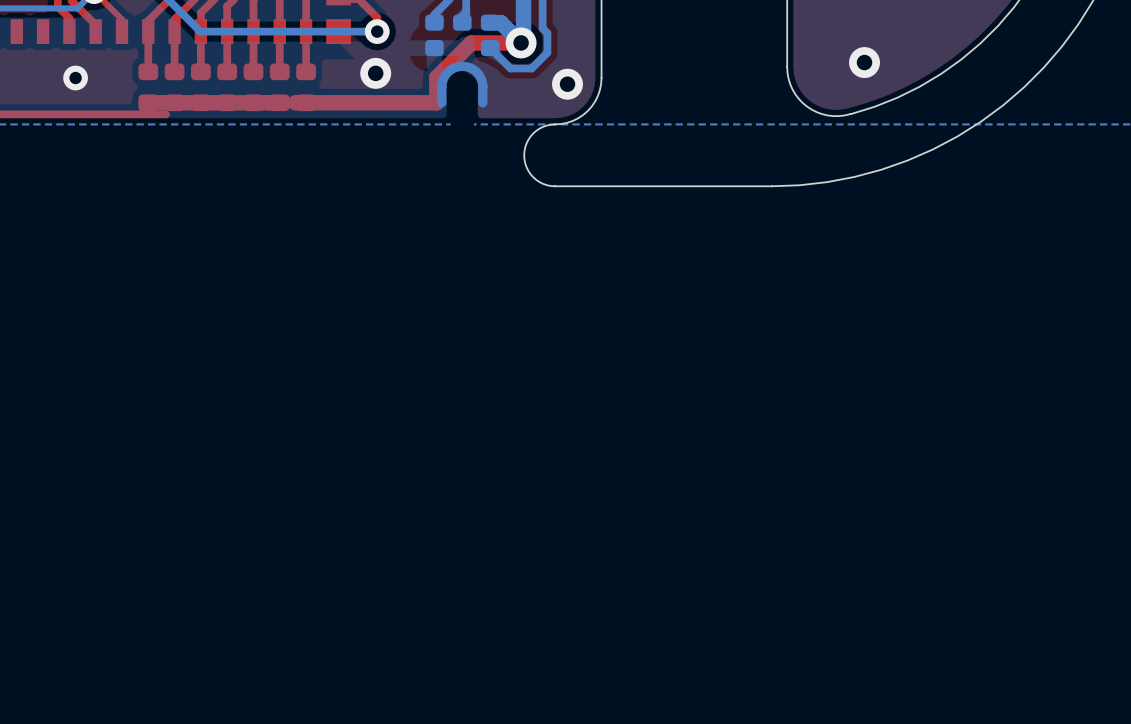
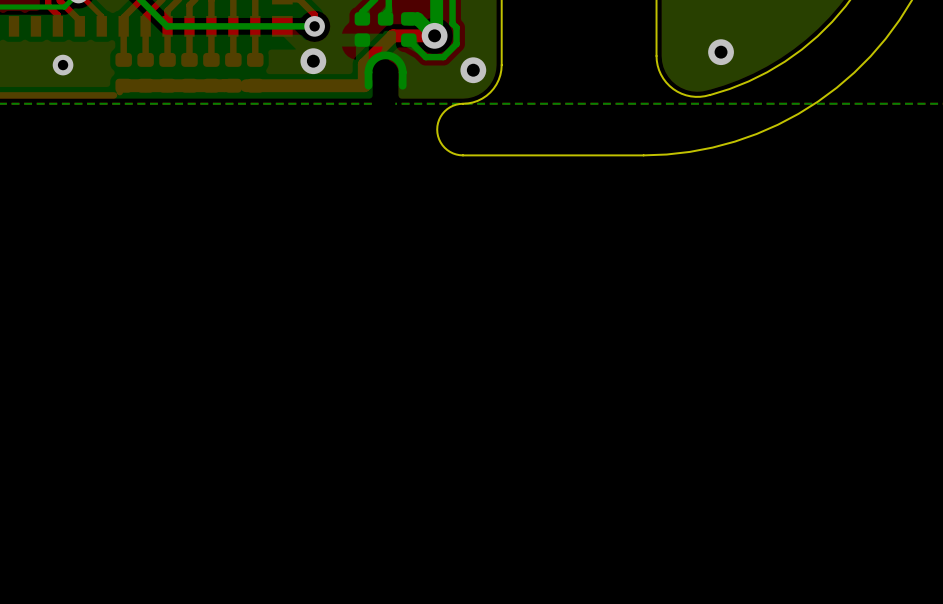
top track: (166, 114) (136, 114) -> none

